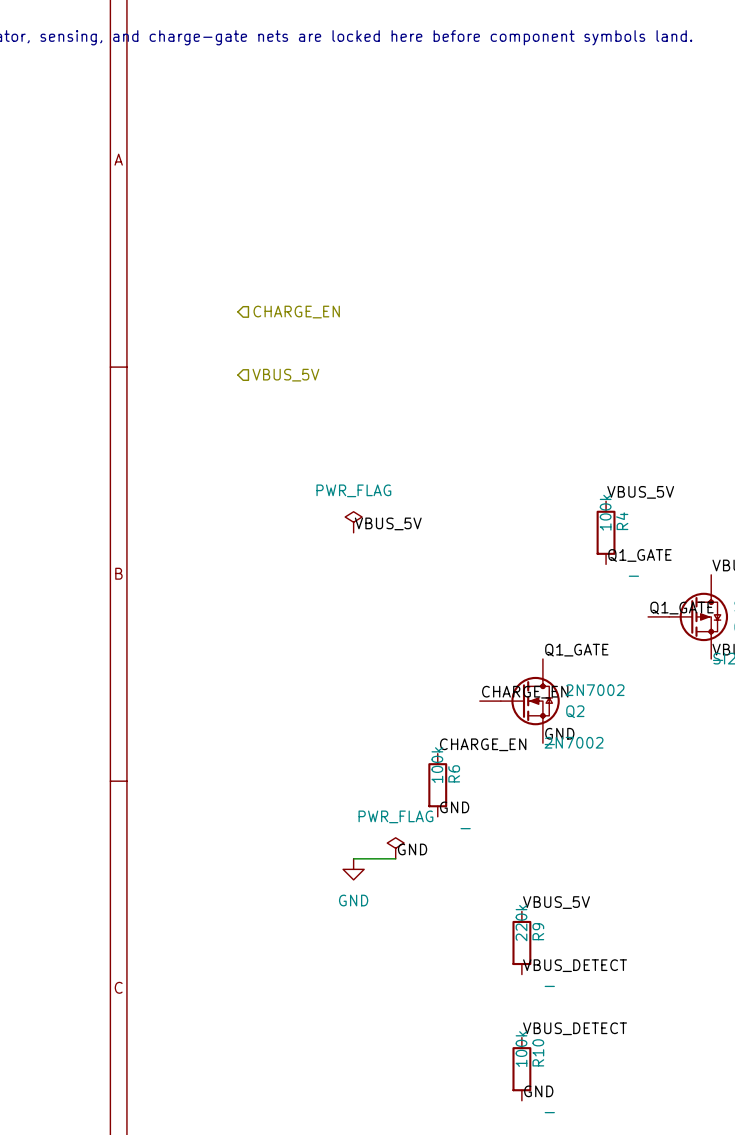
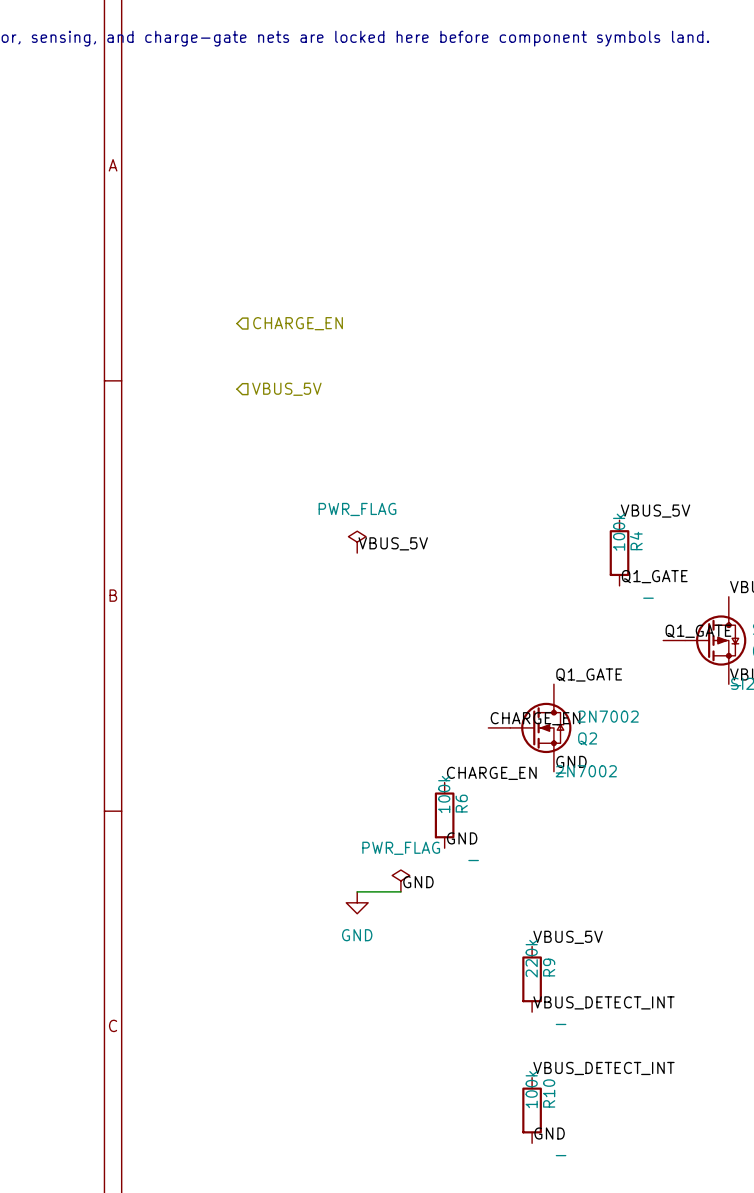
label: VBUS_DETECT (575, 965) -> VBUS_DETECT_INT (603, 1002)
label: VBUS_DETECT (575, 1028) -> VBUS_DETECT_INT (603, 1068)

